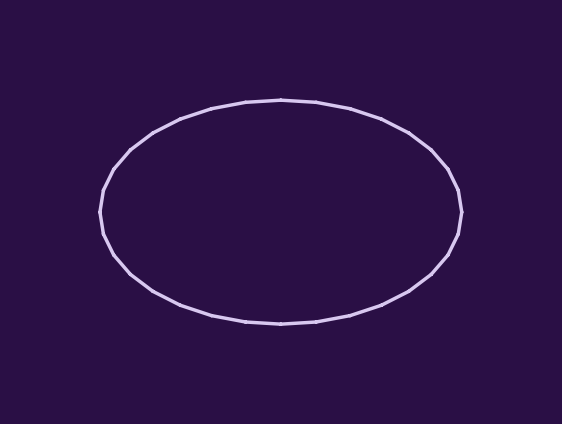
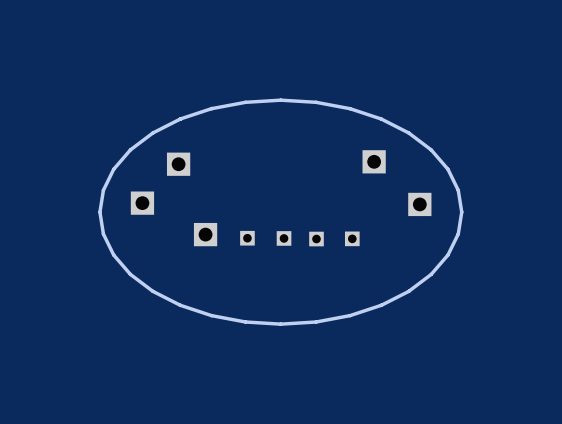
part: none -> (374, 161)
part: none -> (178, 164)
part: none -> (142, 203)
part: none -> (419, 204)
part: none -> (205, 234)
part: none -> (247, 238)
part: none -> (284, 238)
part: none -> (352, 238)
part: none -> (316, 239)

